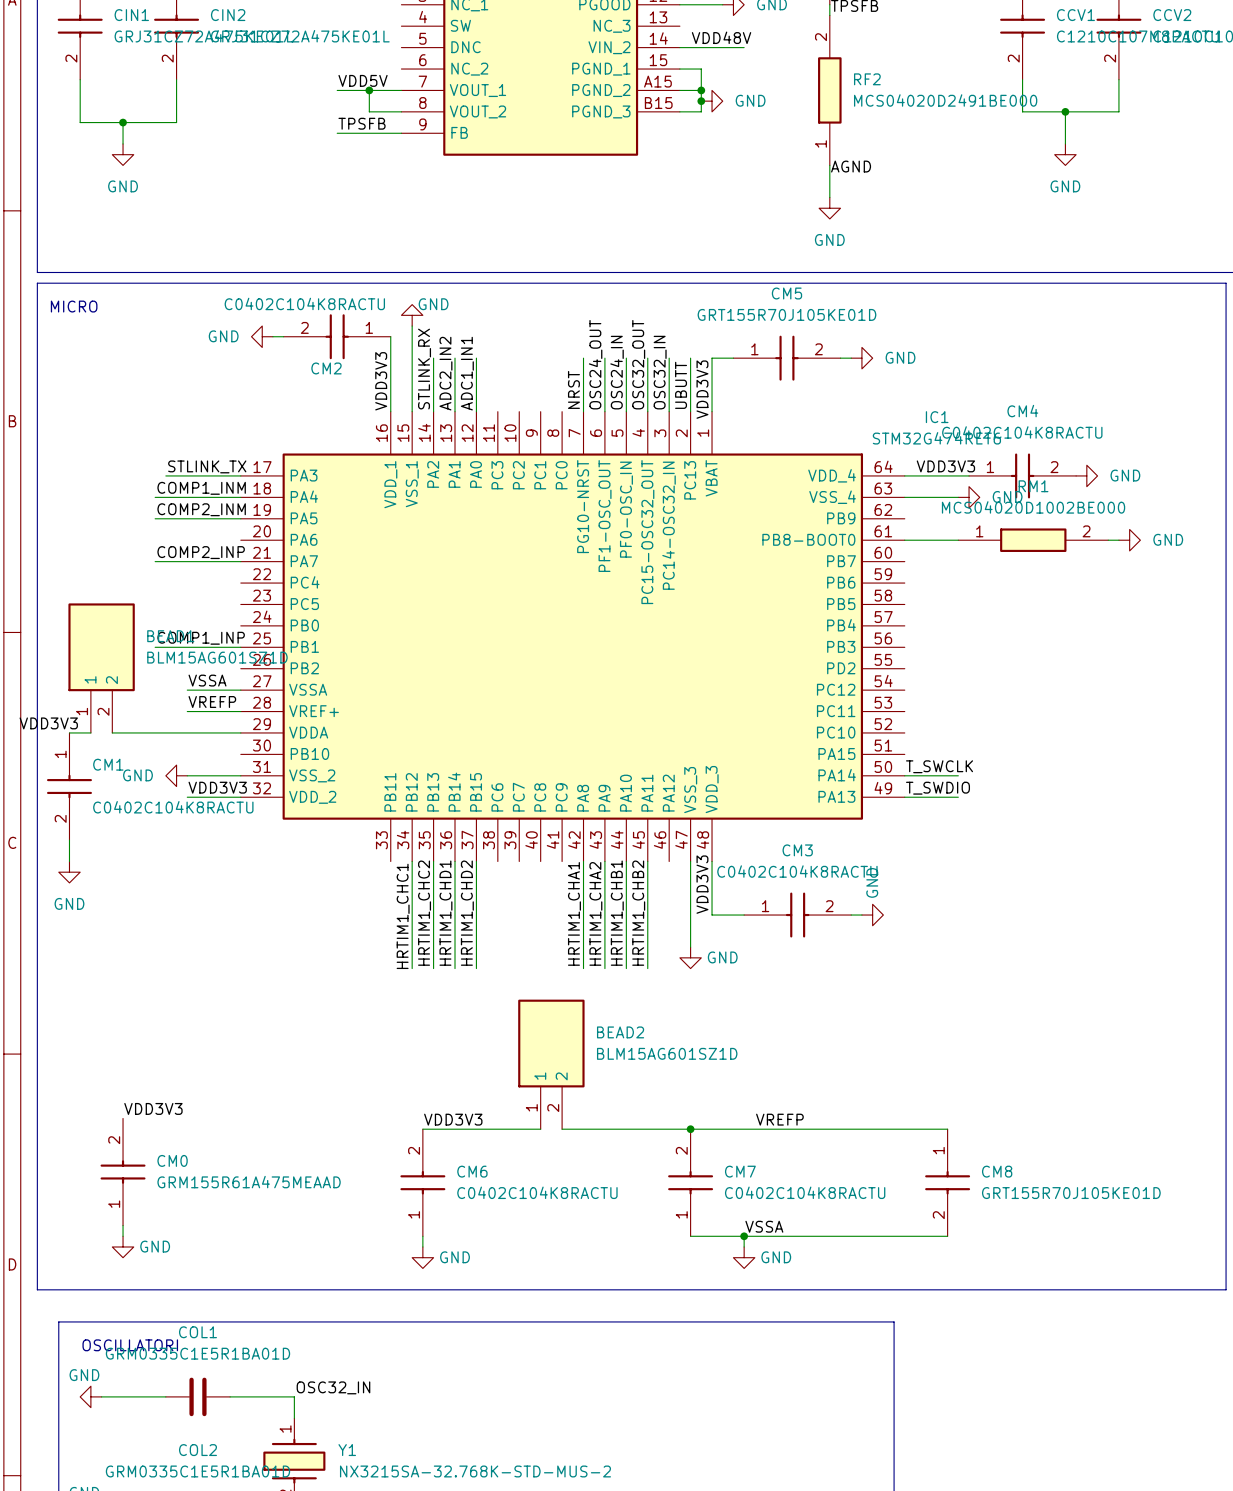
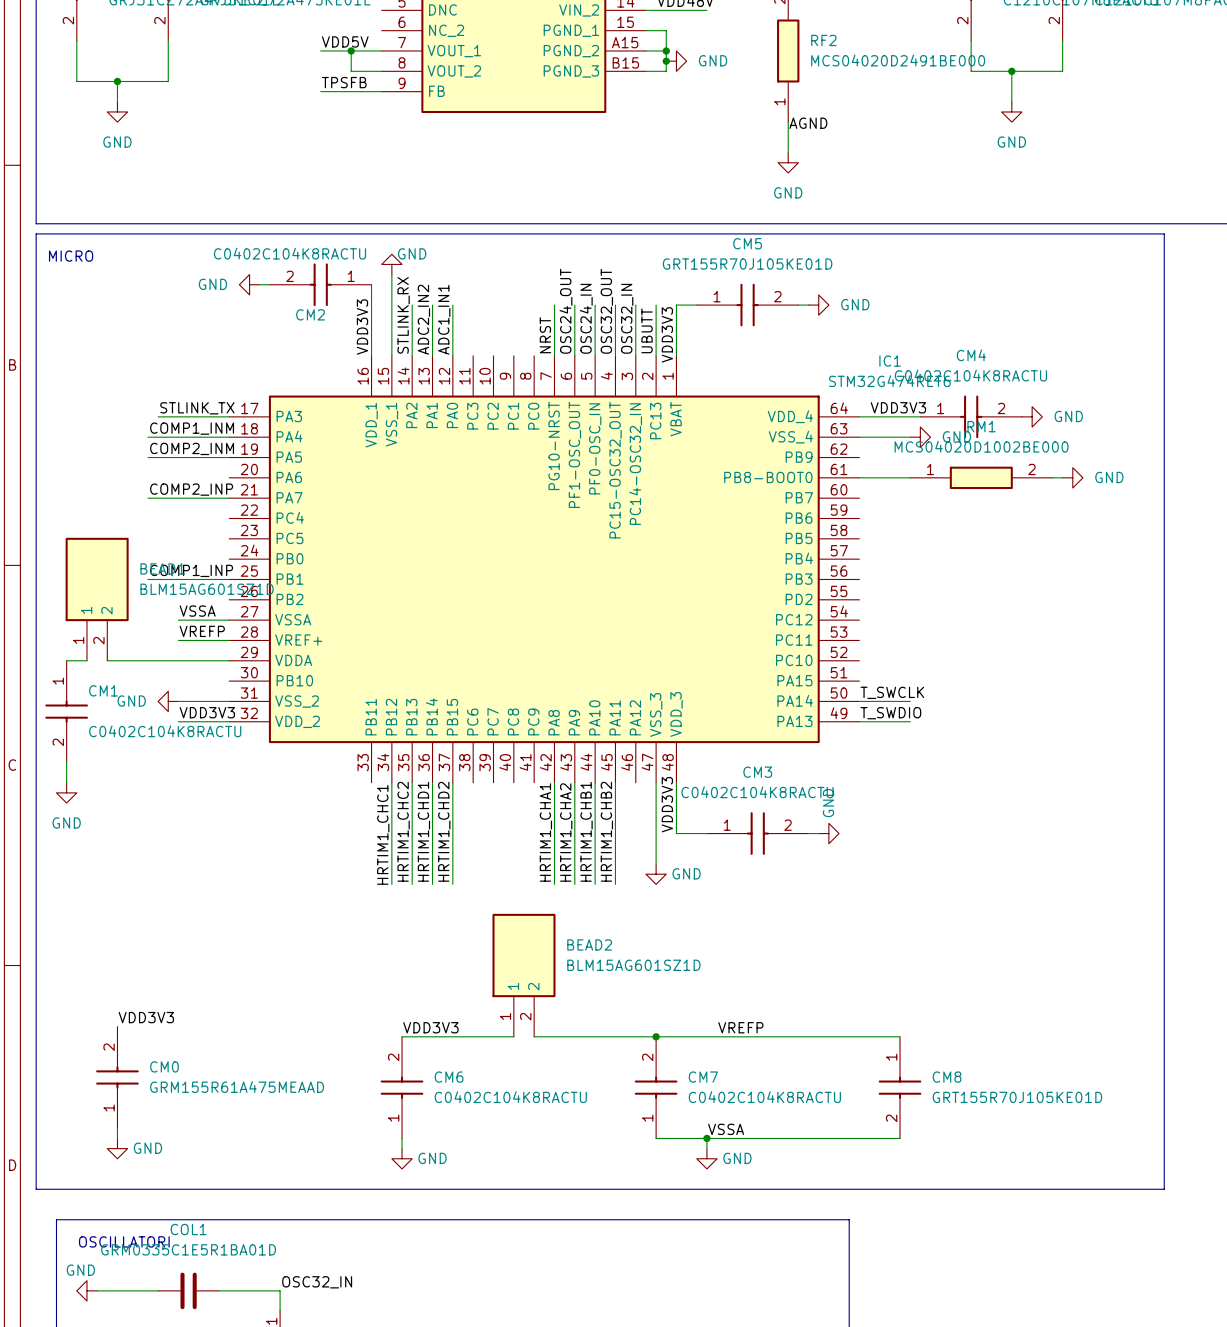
label: VDD3V3 (48, 723) -> none

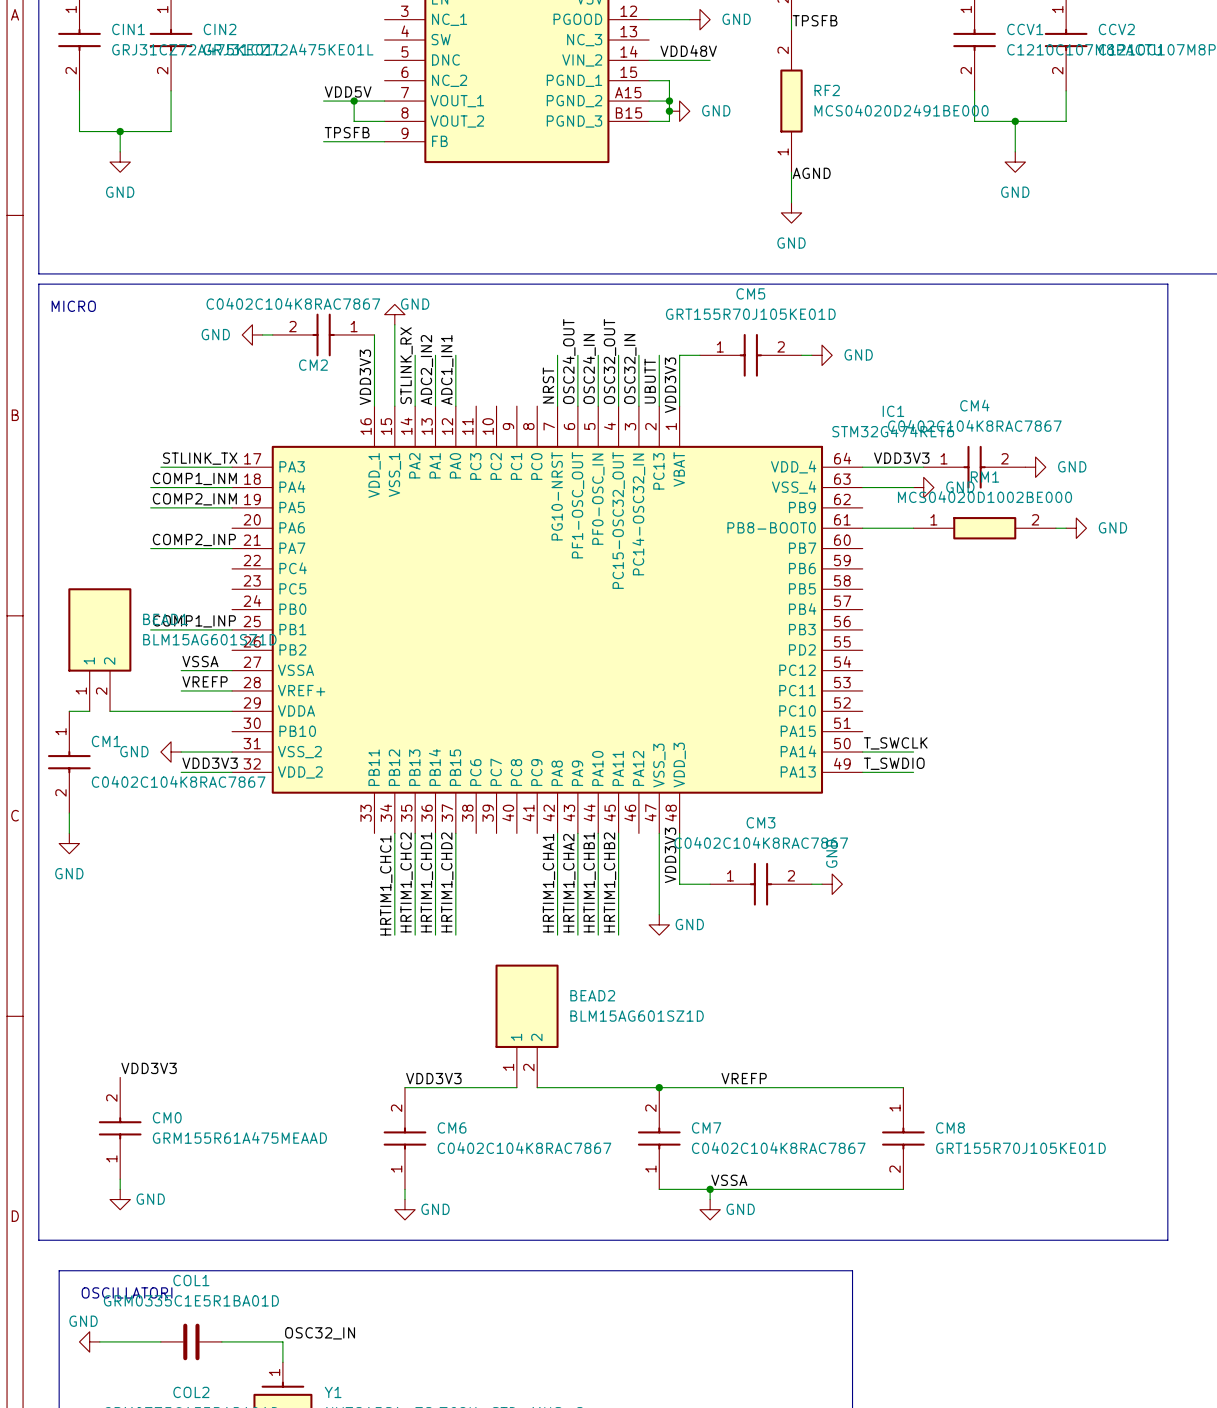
CM2 value: C0402C104K8RACTU (289, 253) -> C0402C104K8RAC7867 (293, 303)
CM4 value: C0402C104K8RACTU (970, 375) -> C0402C104K8RAC7867 (974, 425)
CM1 value: C0402C104K8RACTU (165, 731) -> C0402C104K8RAC7867 (178, 781)
CM3 value: C0402C104K8RACTU (757, 792) -> C0402C104K8RAC7867 (761, 842)
CM6 value: C0402C104K8RACTU (510, 1097) -> C0402C104K8RAC7867 (524, 1148)
CM7 value: C0402C104K8RACTU (764, 1097) -> C0402C104K8RAC7867 (778, 1148)

